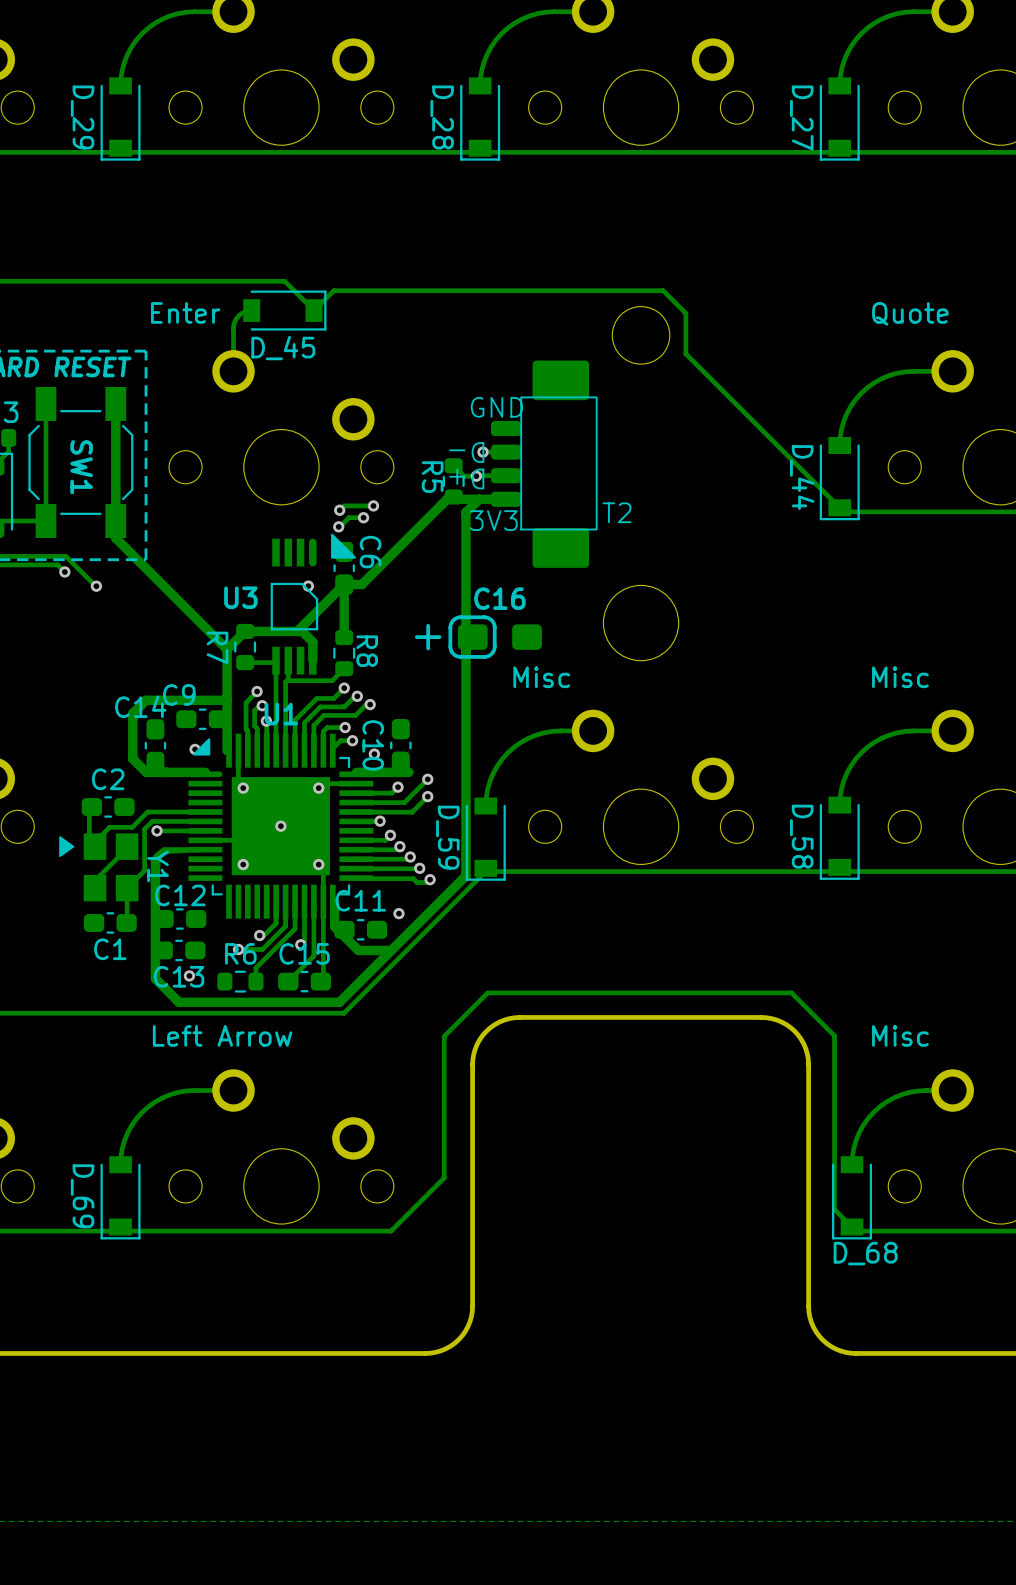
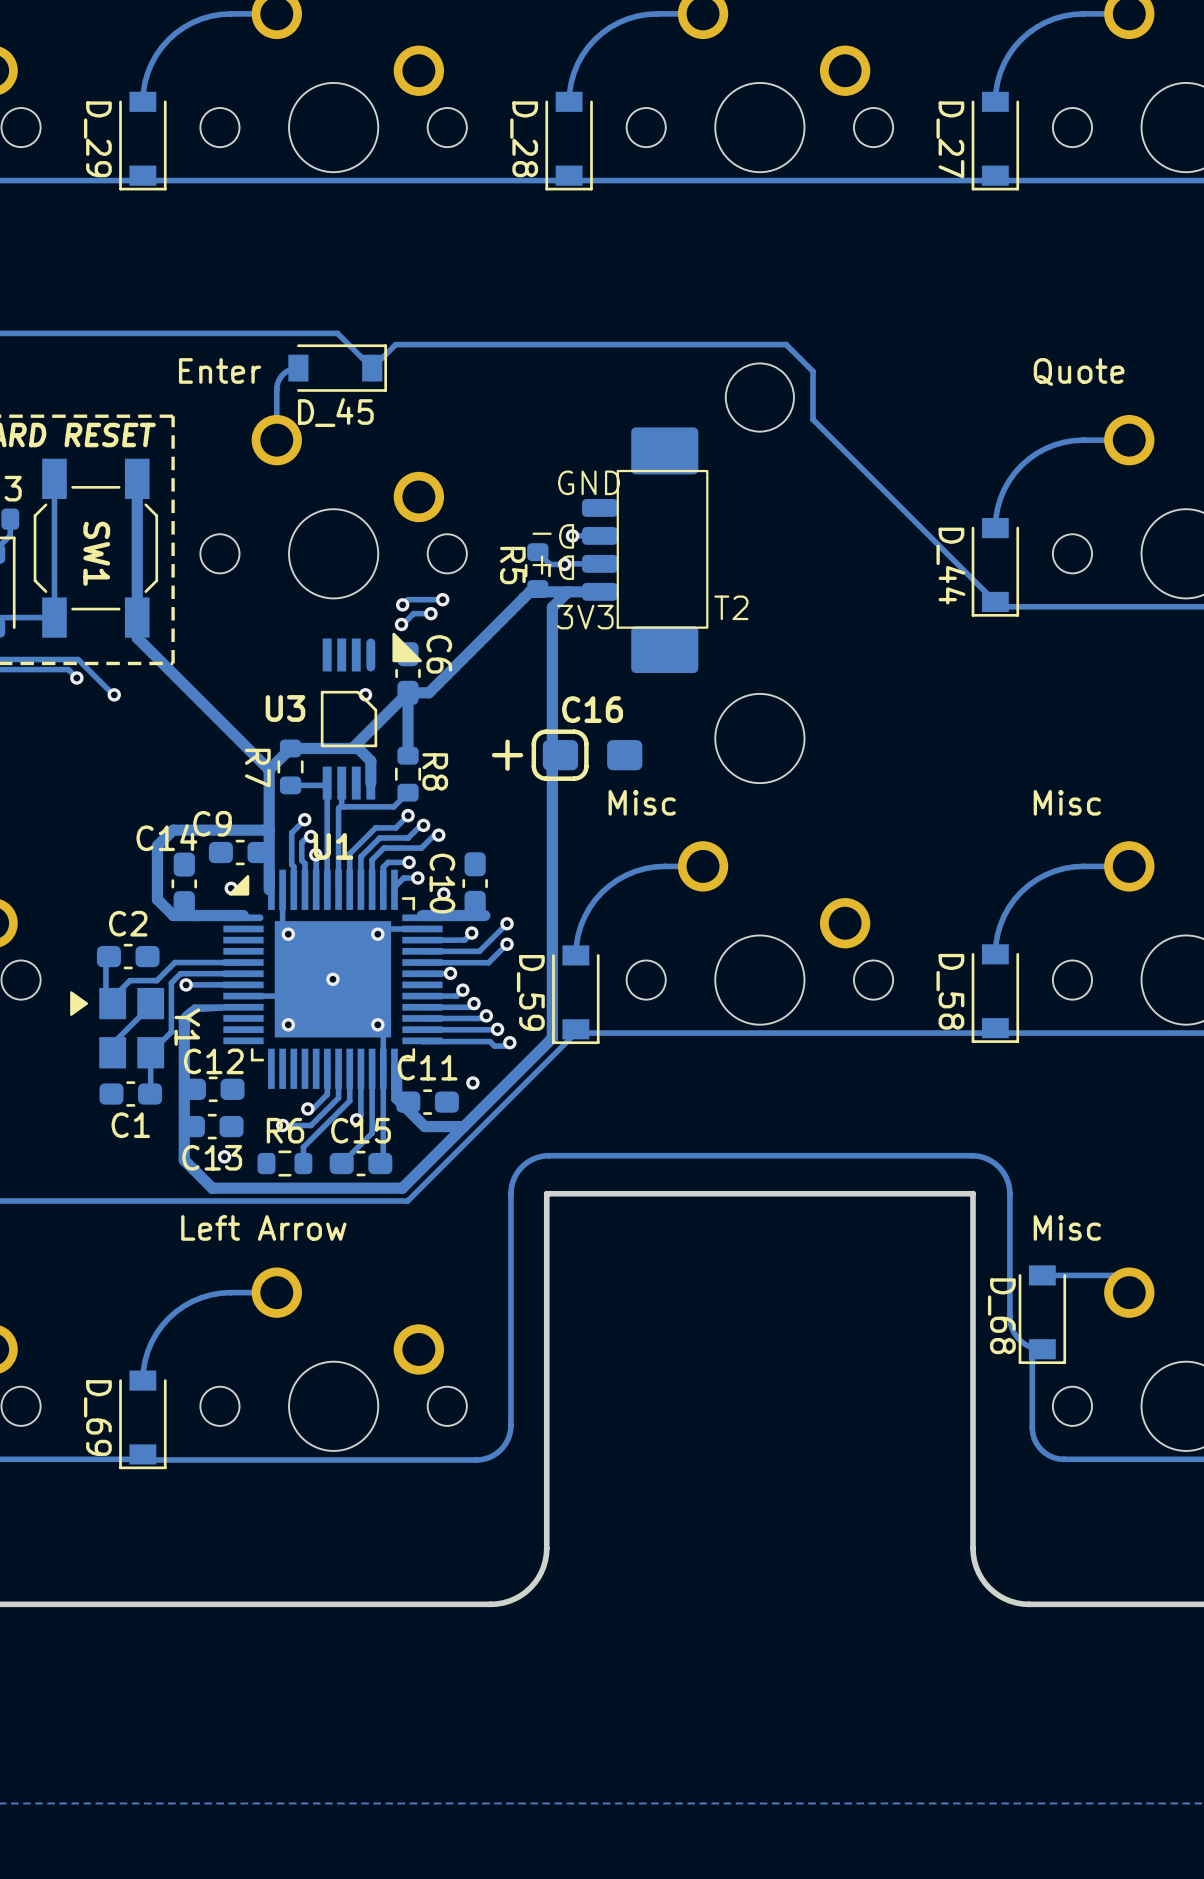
track: (952, 1090) (909, 1092) (894, 1097) (879, 1106) (868, 1118) (859, 1132) (853, 1148) (852, 1164) -> (1129, 1292) (1124, 1280) (1114, 1275) (1042, 1275)
D_68 position: (852, 1197) -> (1042, 1314)
track: (852, 1226) (834, 1209) (834, 1035) (791, 992) (487, 992) (444, 1036) (444, 1177) (391, 1231) (124, 1231) -> none
track: (897, 1231) (861, 1231) -> (1064, 1459) (1053, 1457) (1044, 1452) (1037, 1444) (1033, 1434) (1032, 1358) (1035, 1352) (1042, 1349) (1031, 1347) (1022, 1342) (1014, 1334) (1010, 1324) (1009, 1193) (1007, 1181) (1001, 1170) (992, 1161) (971, 1155) (548, 1155) (536, 1157) (519, 1170) (511, 1189) (510, 1425) (507, 1440) (497, 1452) (487, 1458) (476, 1460) (148, 1460) (144, 1458) (142, 1454)
D_68 name rotation: 0° (865, 1253) -> 90° clockwise (1001, 1316)
board edge: (868, 1353) (845, 1352) (830, 1346) (818, 1335) (811, 1321) (808, 1306) (808, 1059) (803, 1044) (794, 1031) (781, 1022) (761, 1017) (519, 1017) (504, 1020) (486, 1031) (477, 1044) (472, 1064) (471, 1316) (465, 1331) (450, 1346) (435, 1352) (414, 1353) -> (1028, 1604) (1010, 1601) (994, 1592) (981, 1578) (973, 1554) (973, 1193) (546, 1193) (546, 1554) (538, 1578) (525, 1592) (509, 1601) (490, 1604)

